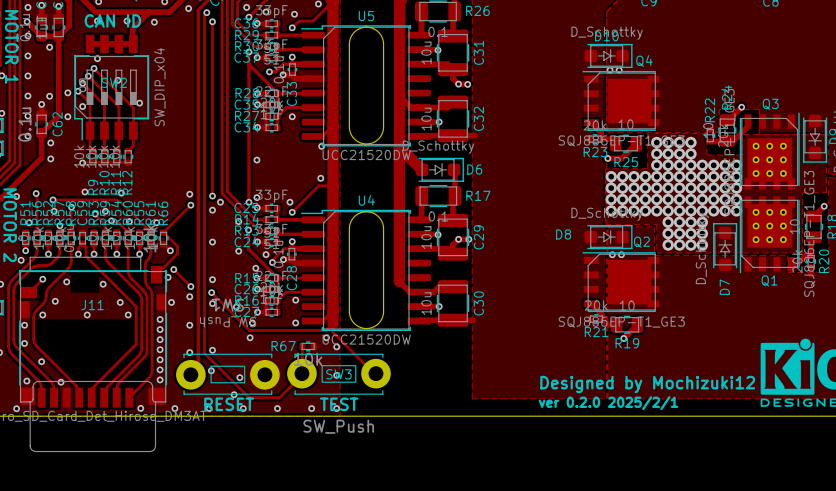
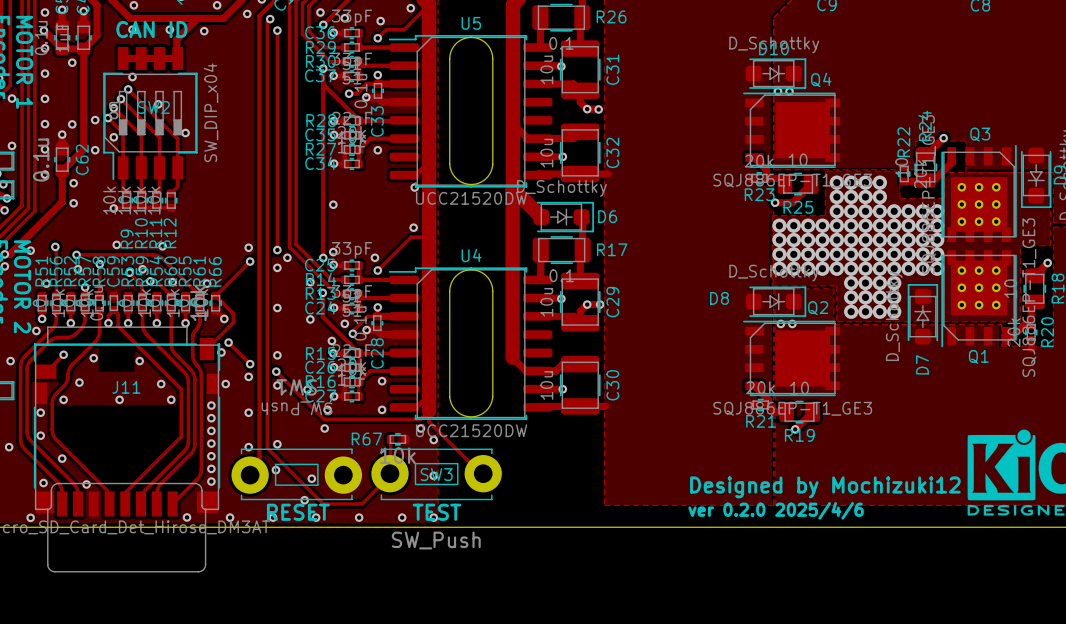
text: ver 0.2.0 2025/2/1 (608, 403) -> ver 0.2.0 2025/4/6 (776, 510)

